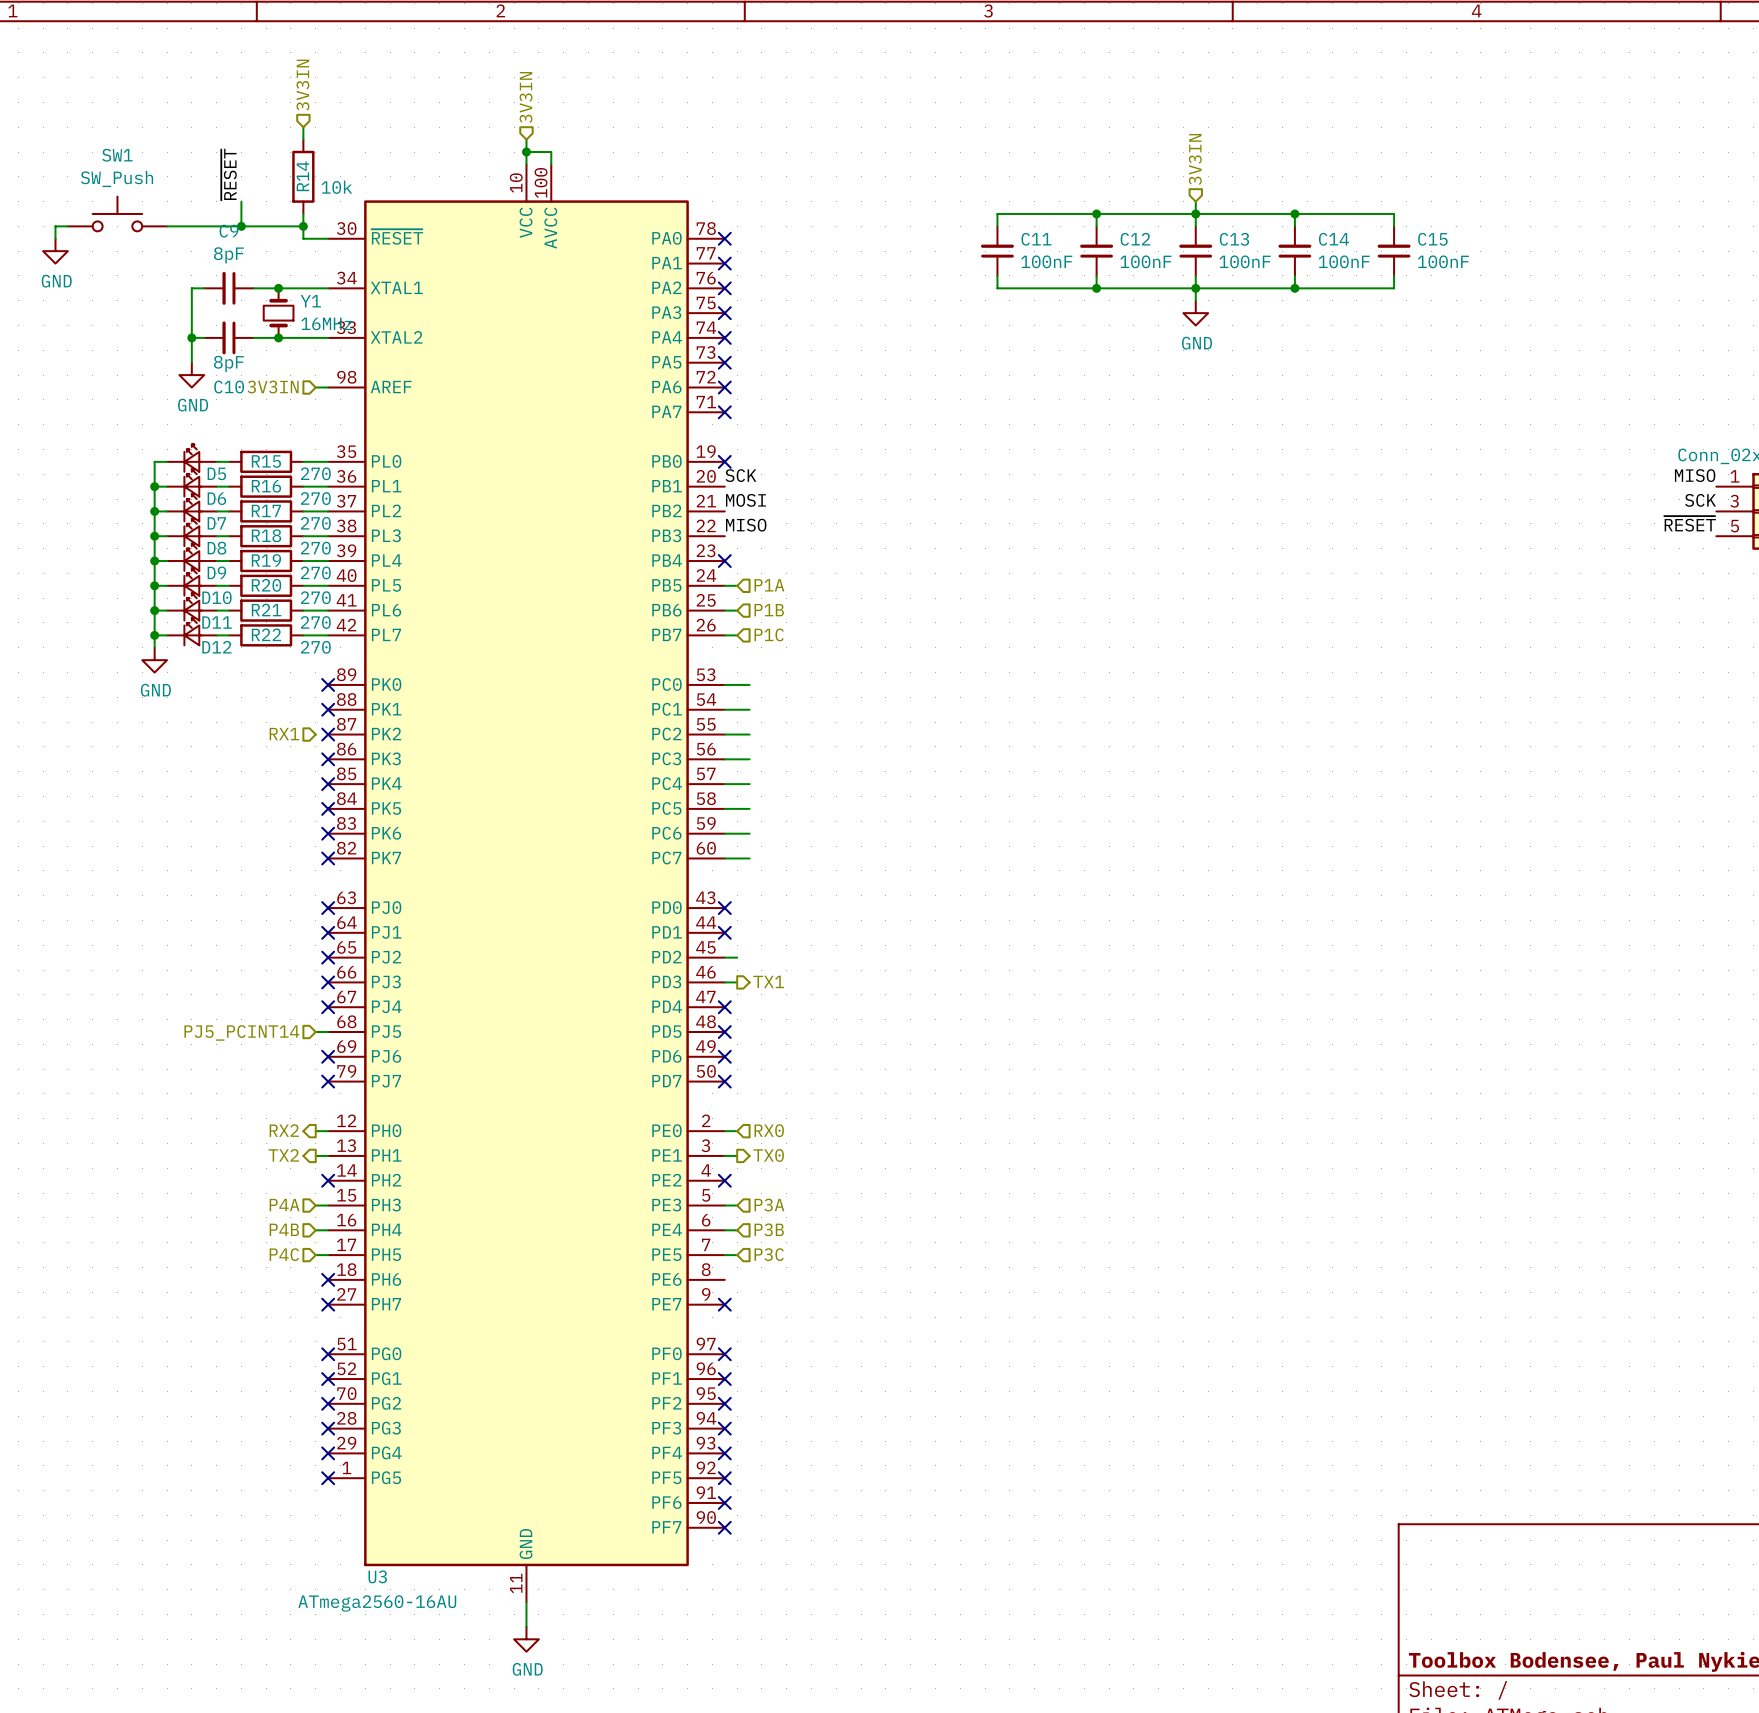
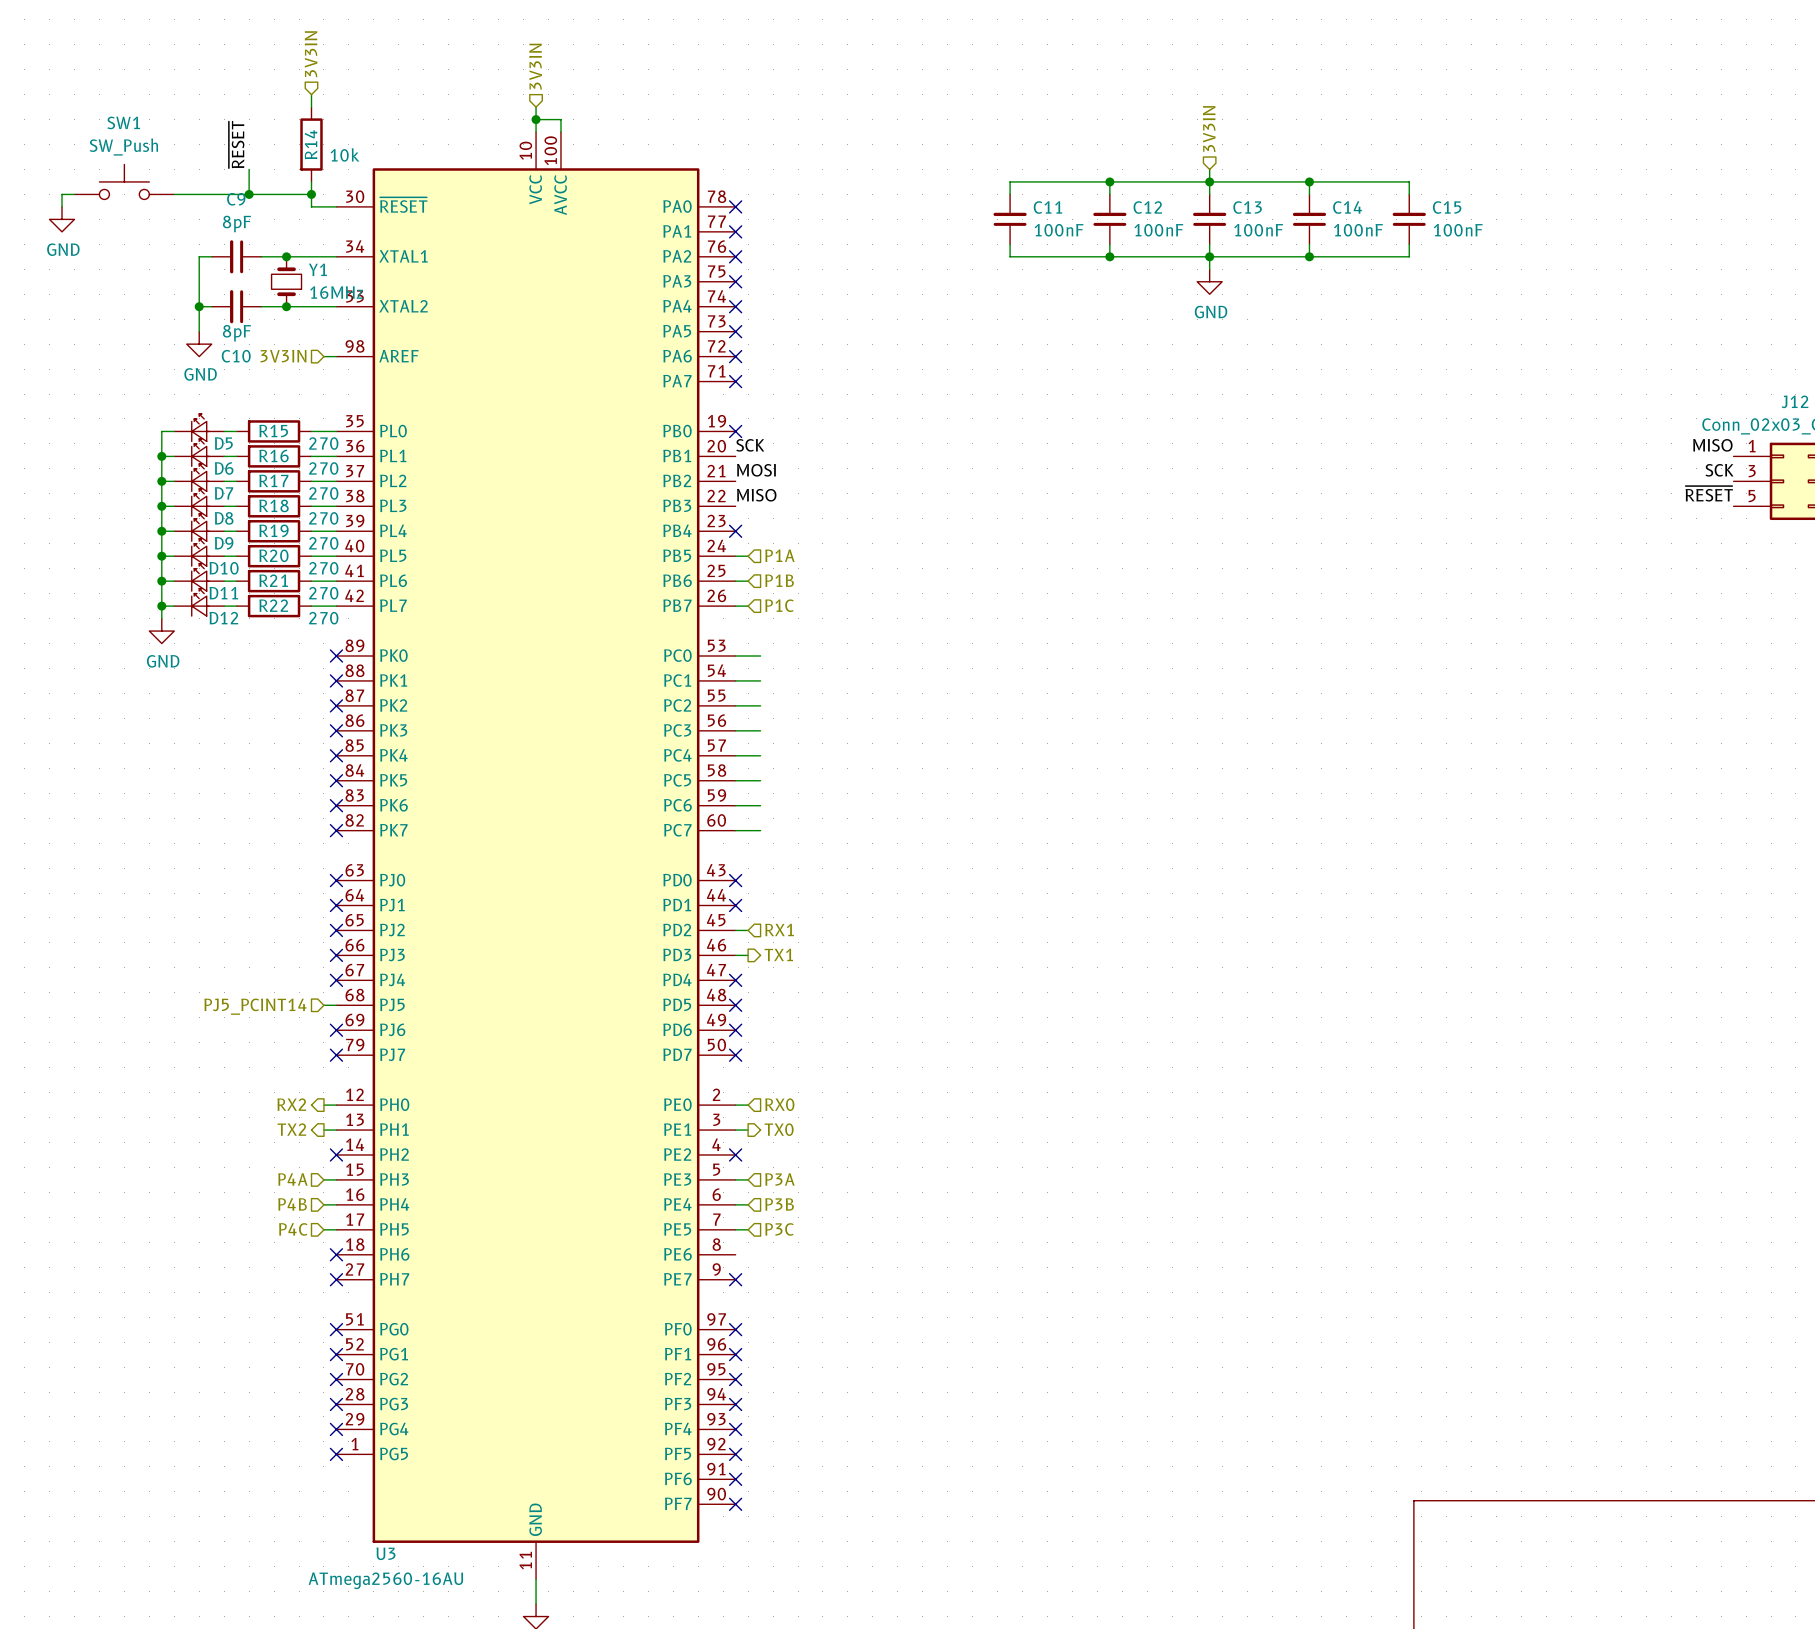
hierarchical label: RX1 (284, 734) -> none
hierarchical label: none -> RX1 (779, 929)

